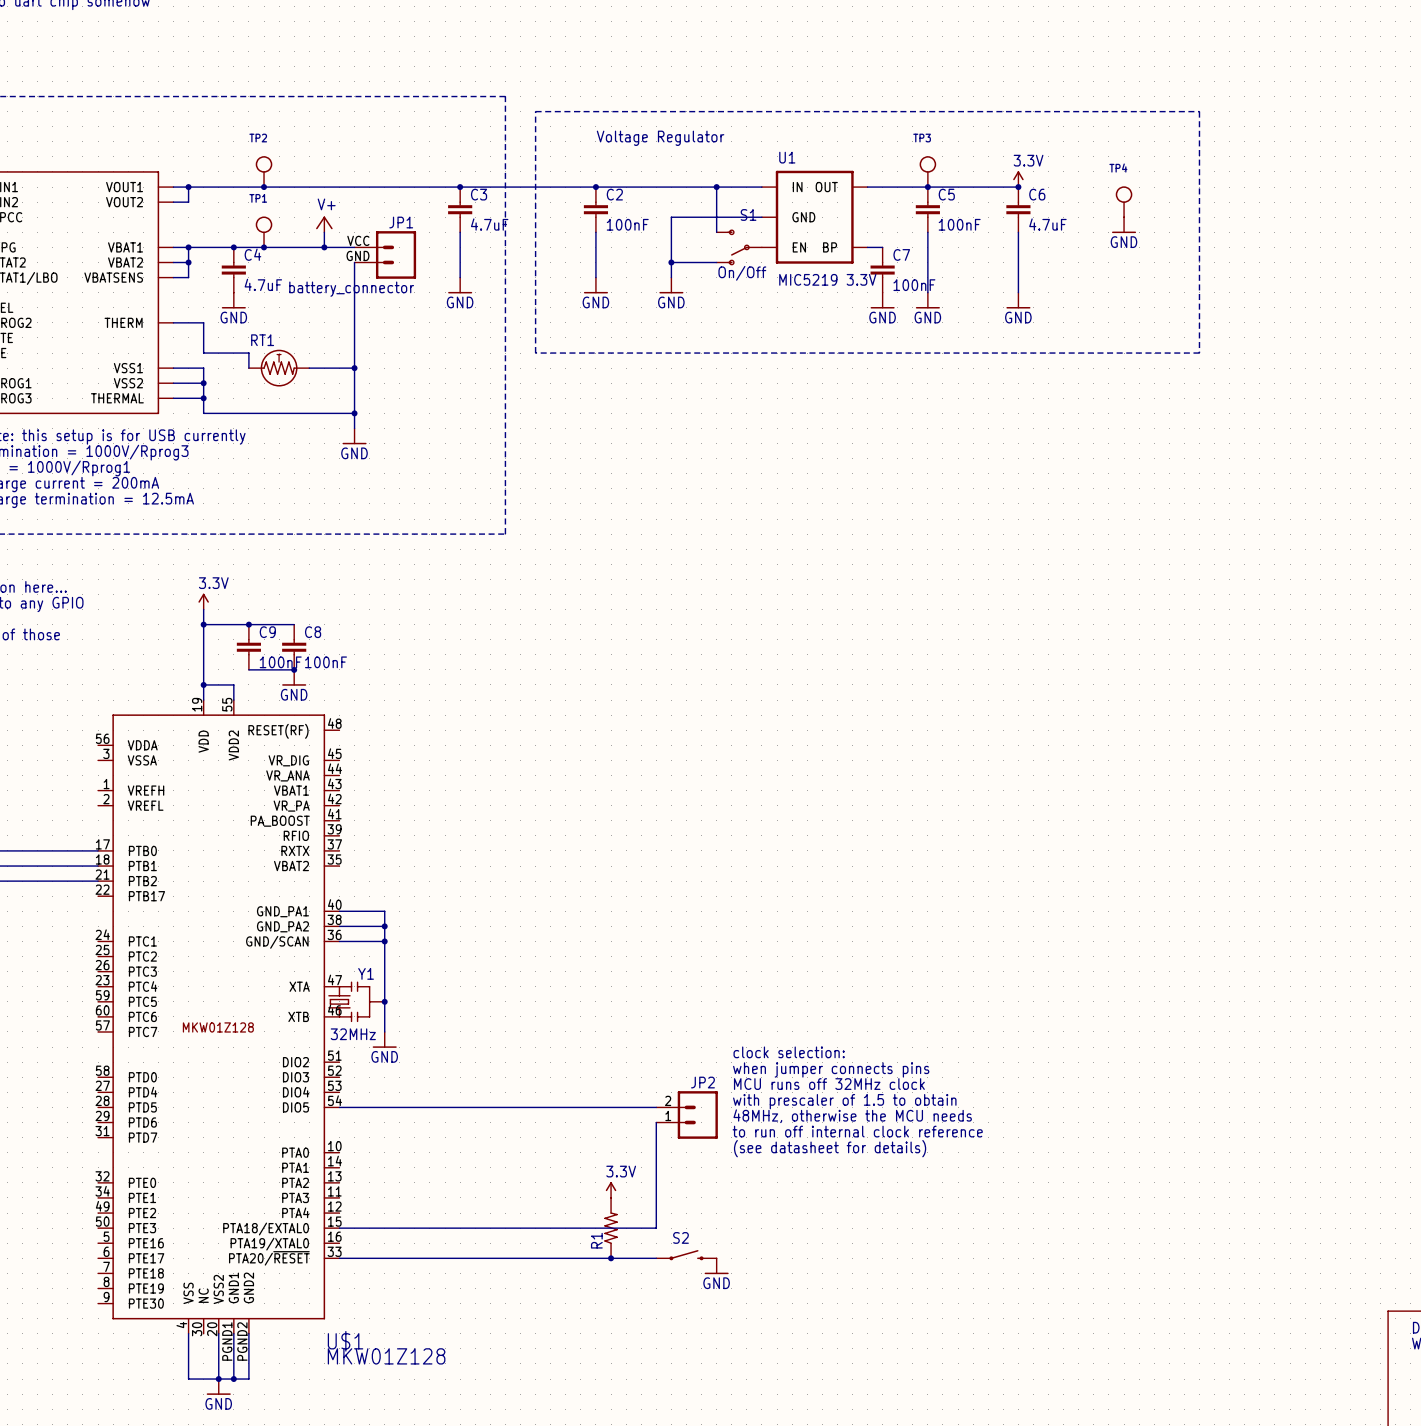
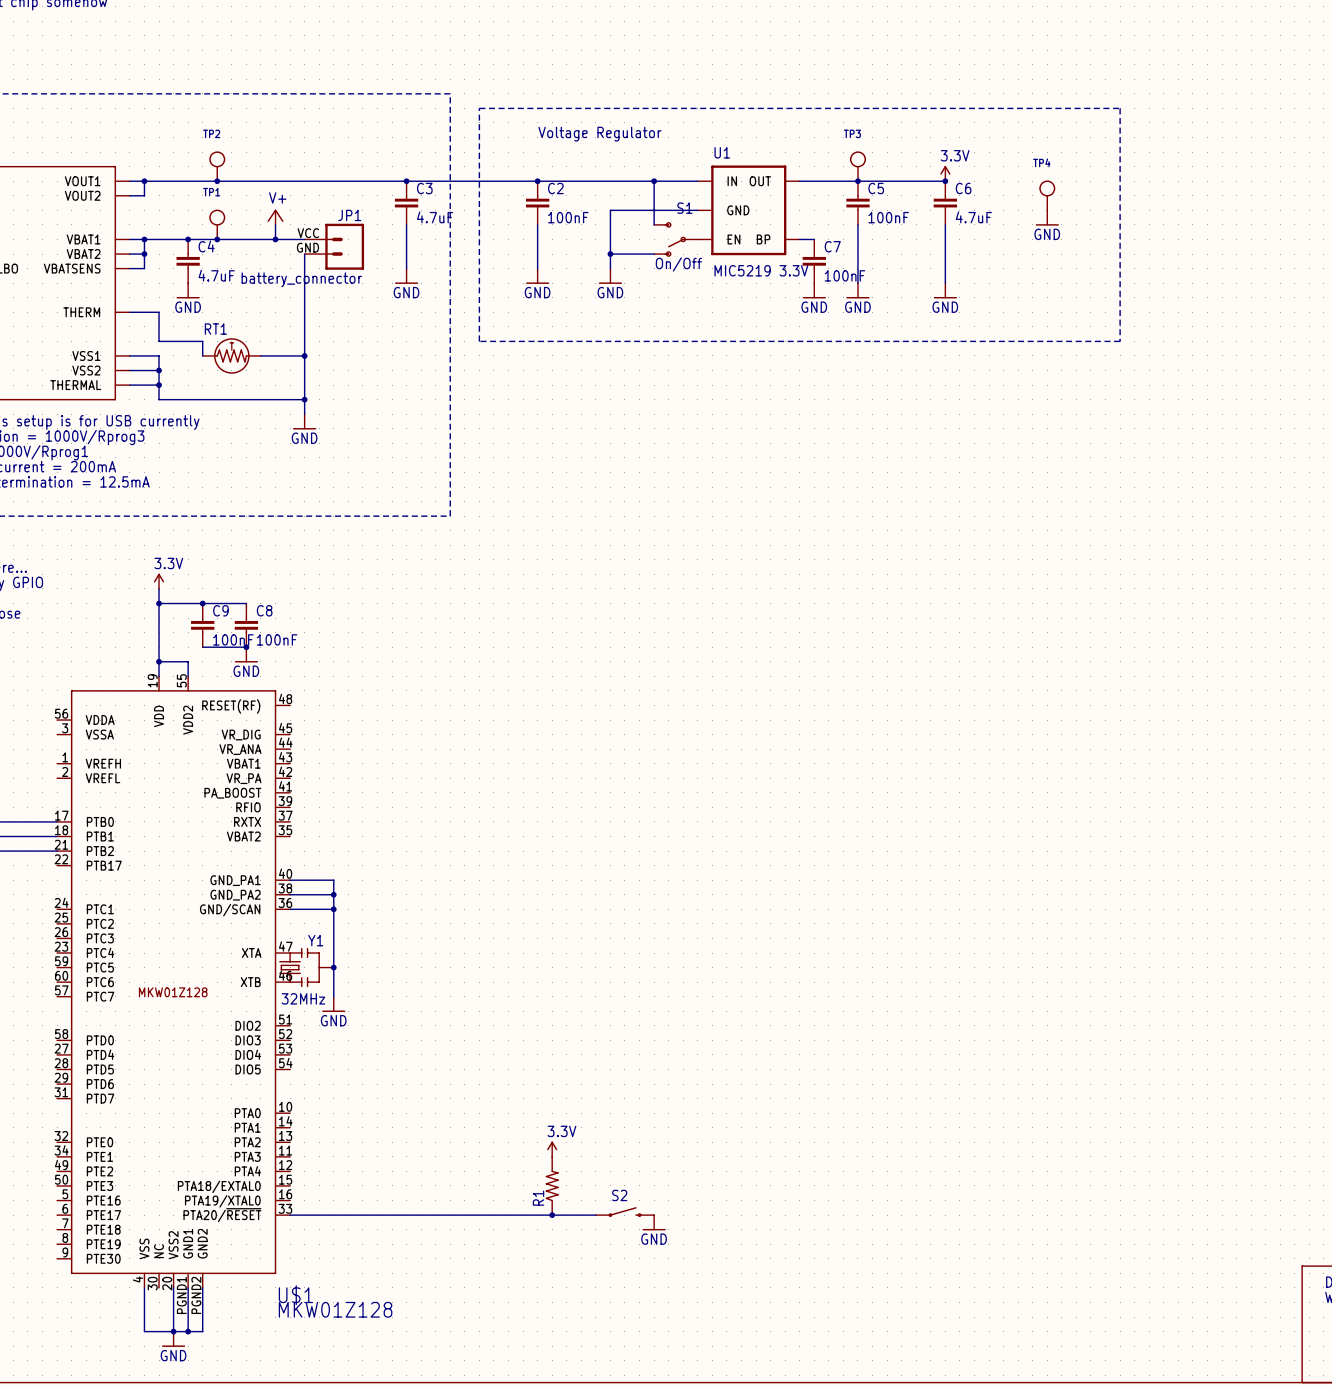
text: clock selection: (789, 1052) -> none
text: when jumper connects pins (831, 1069) -> none
text: MCU runs off 32MHz clock (829, 1084) -> none
text: with prescaler of 1.5 to obtain (844, 1101) -> none
wire: (339, 1107) (656, 1107) -> none
JP2: (687, 1114) -> none
text: 48MHz, otherwise the MCU needs (852, 1116) -> none
wire: (656, 1122) (656, 1228) (339, 1228) -> none
text: to run off internal clock reference (857, 1131) -> none
text: (see datasheet for details) (830, 1148) -> none

